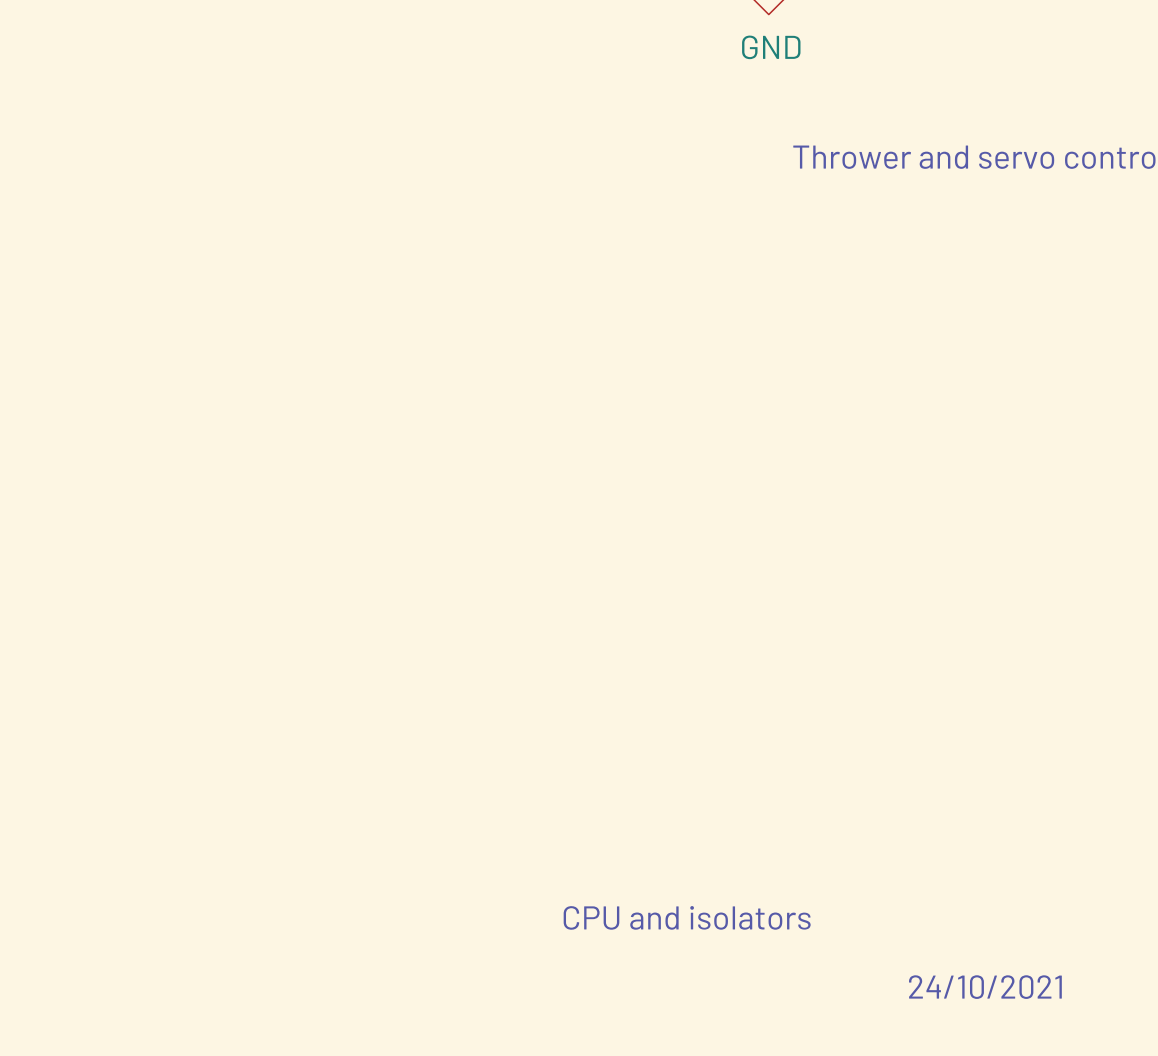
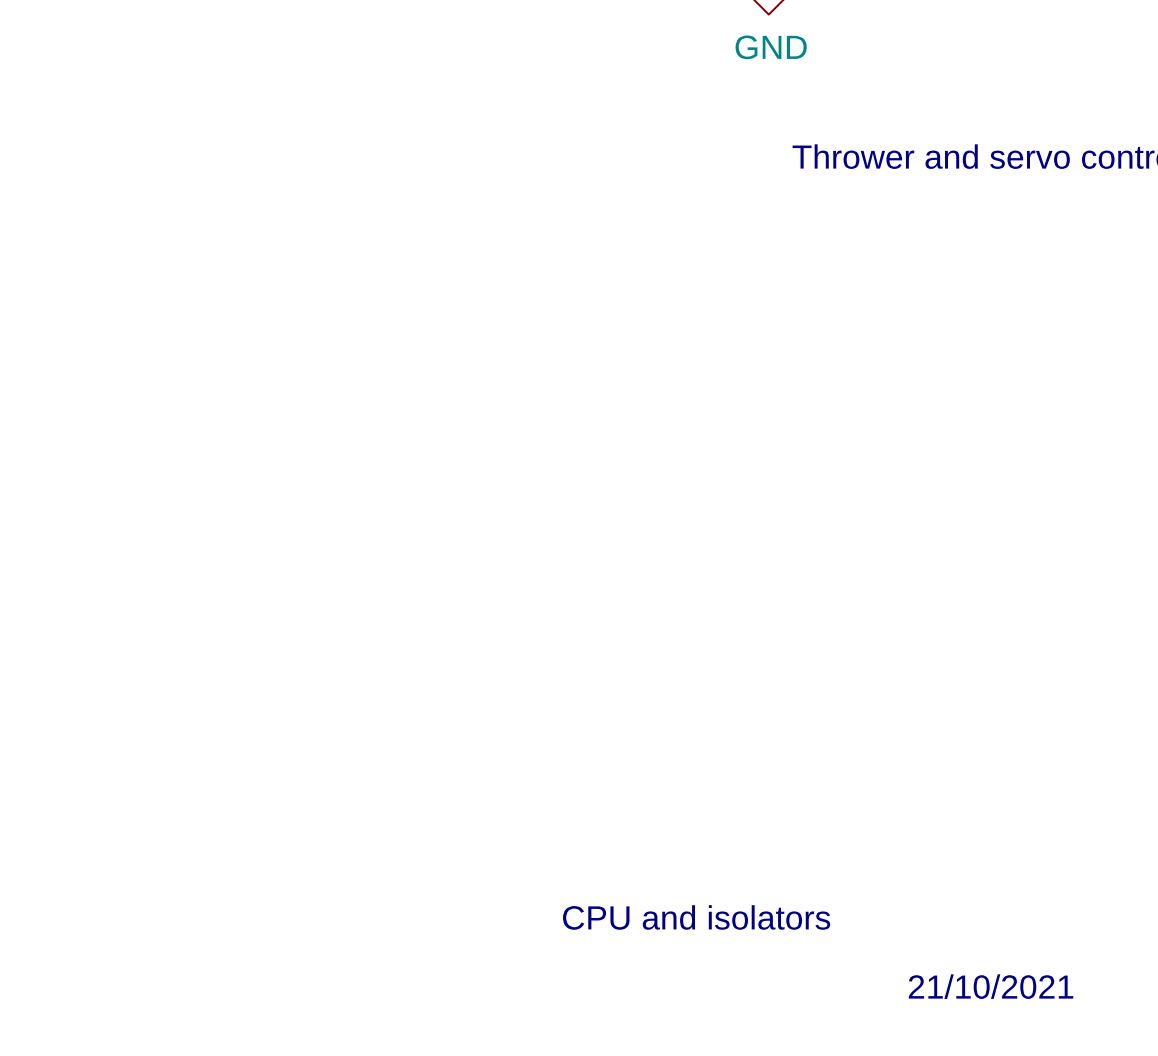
text: 24/10/2021 (985, 987) -> 21/10/2021 (991, 986)

